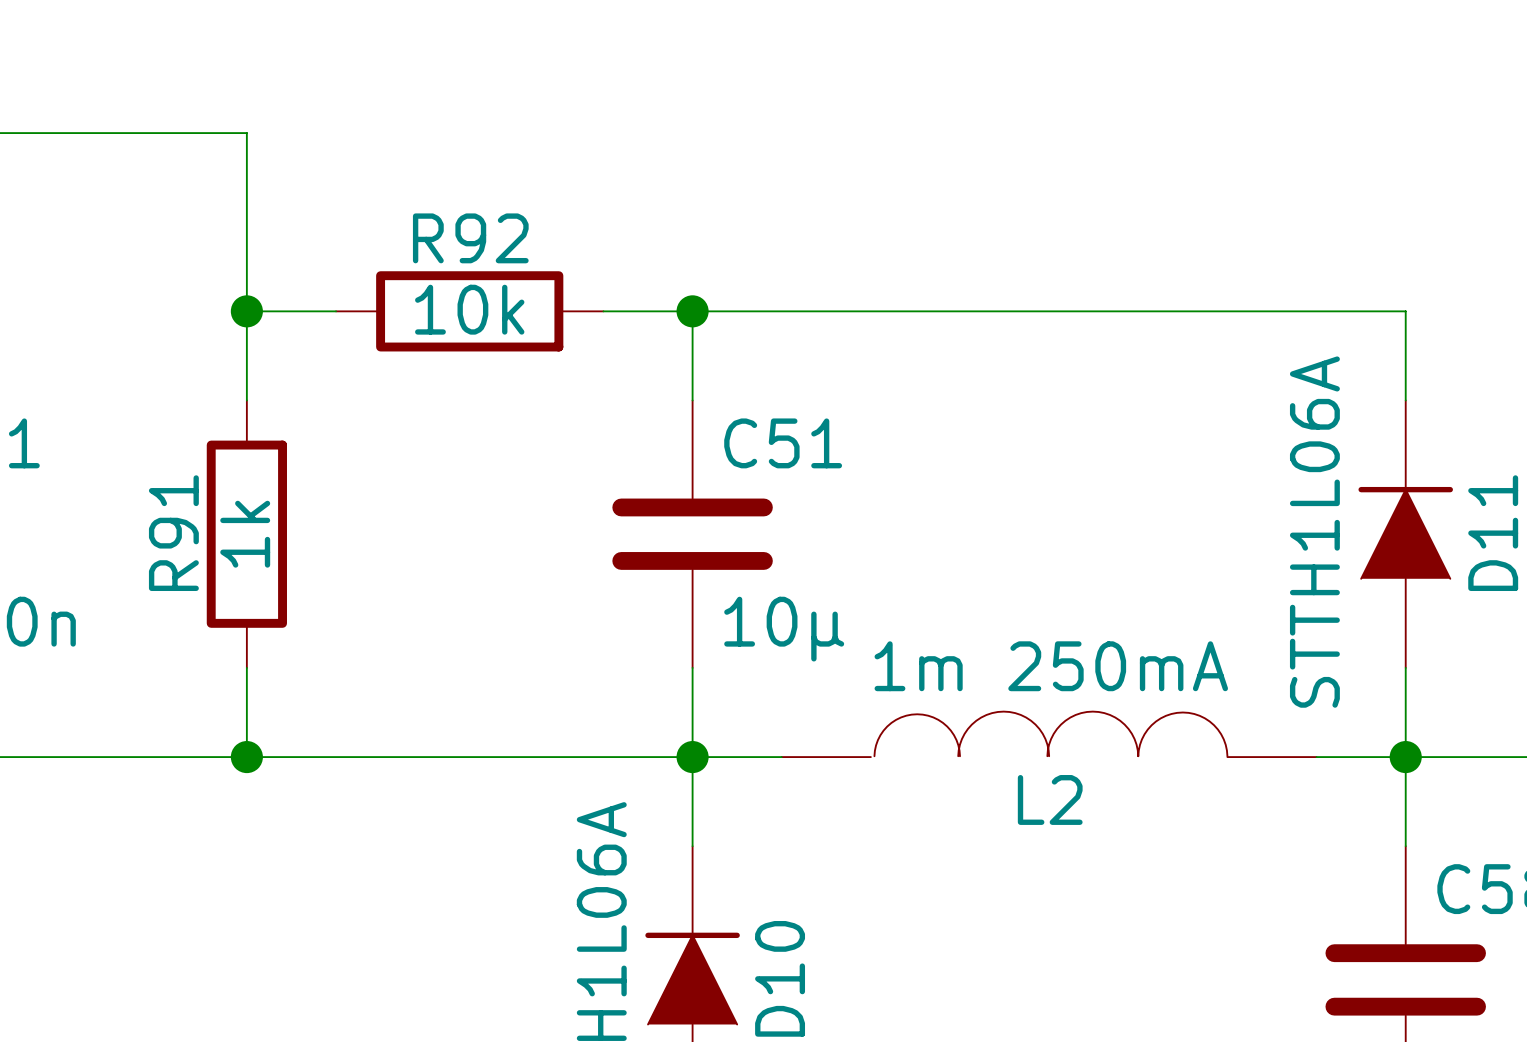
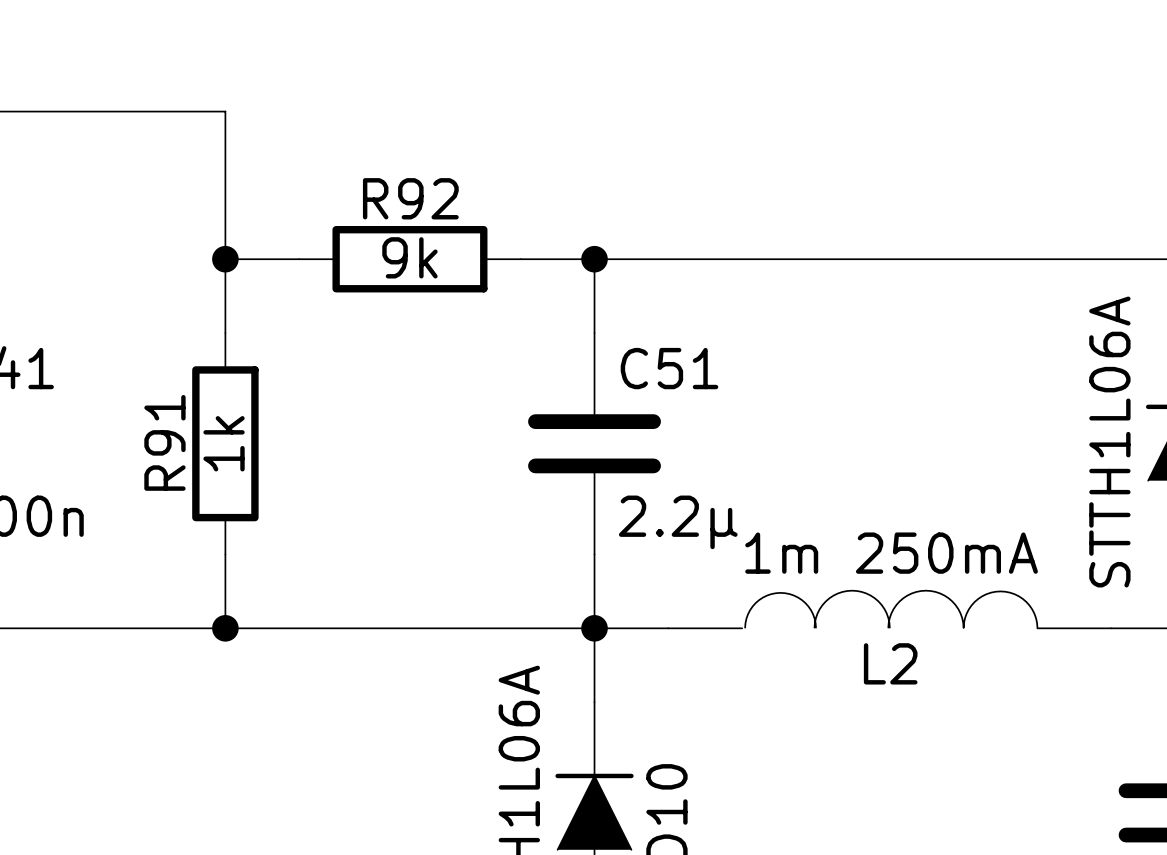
R92 value: 10k (469, 309) -> 9k (409, 257)
C51 value: 10µ (784, 629) -> 2.2µ (678, 522)

